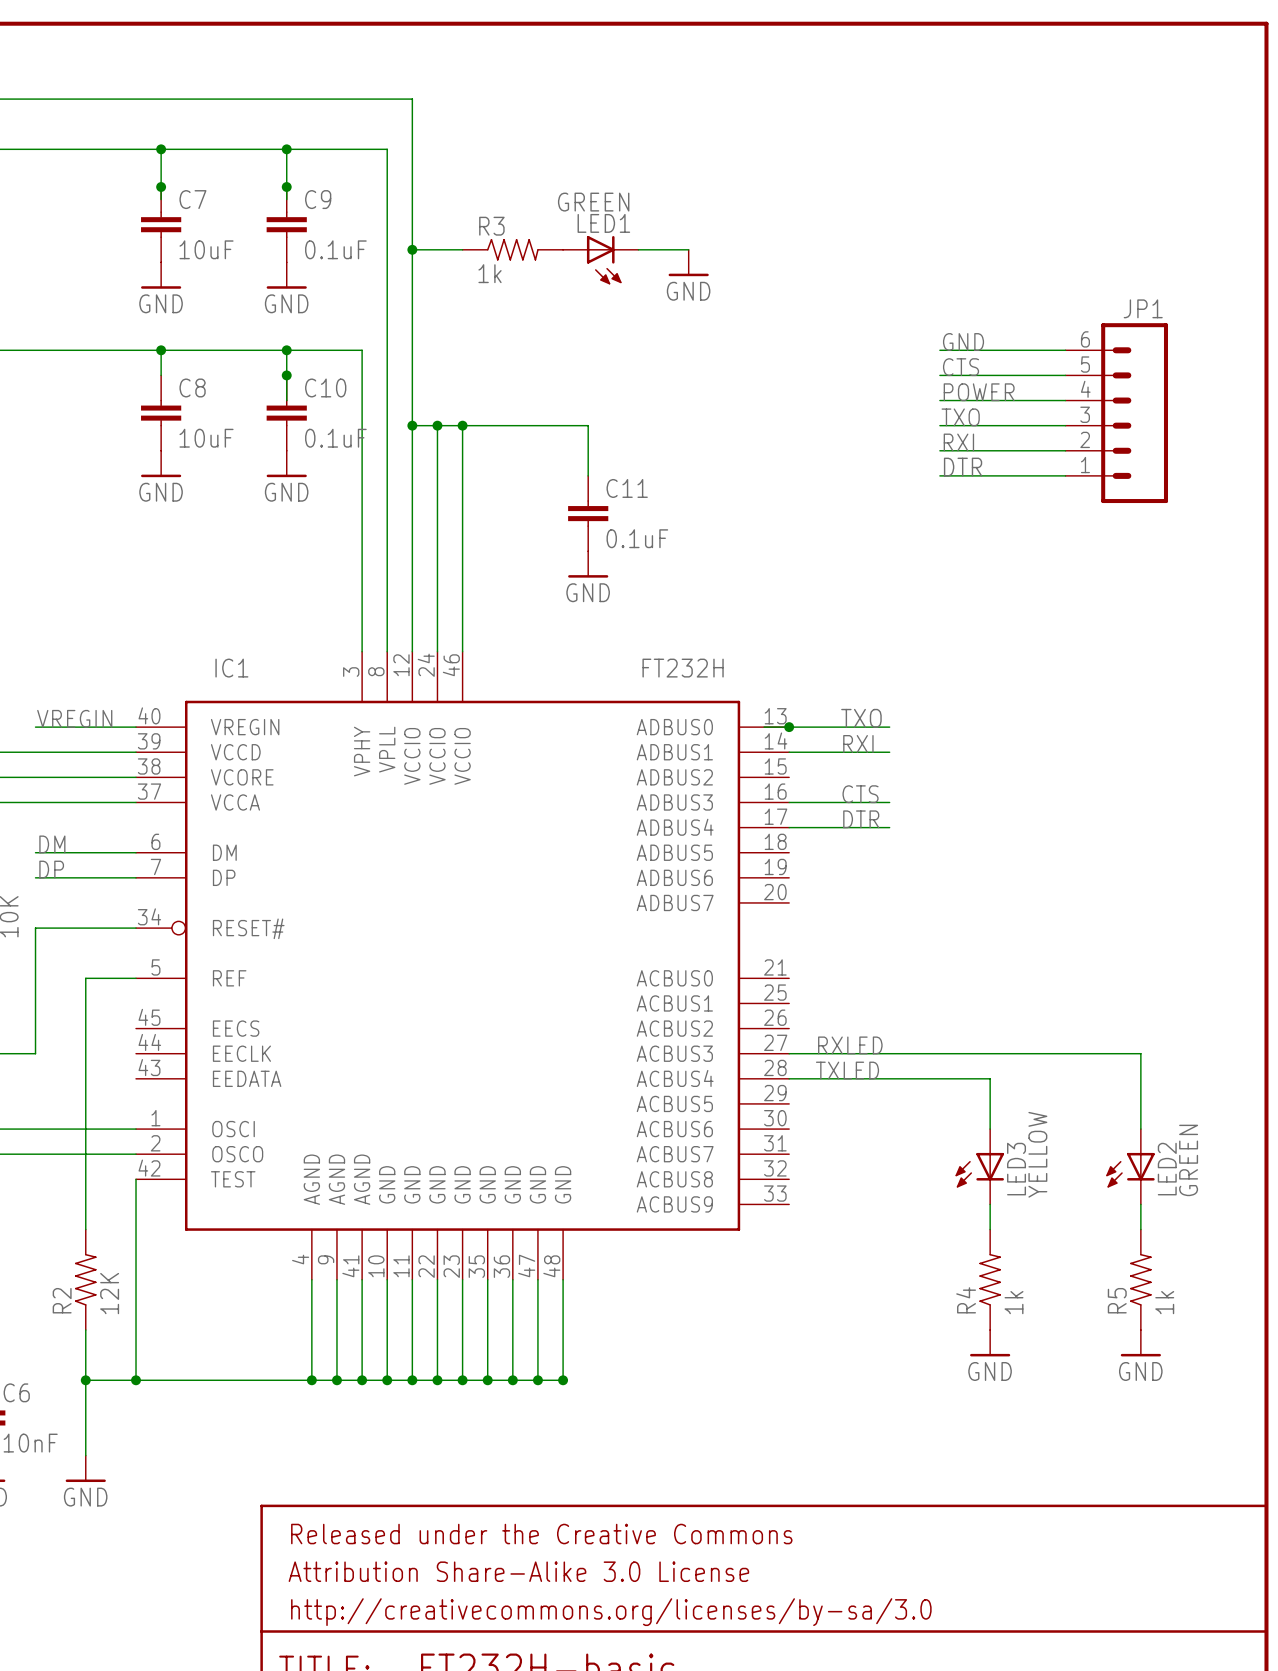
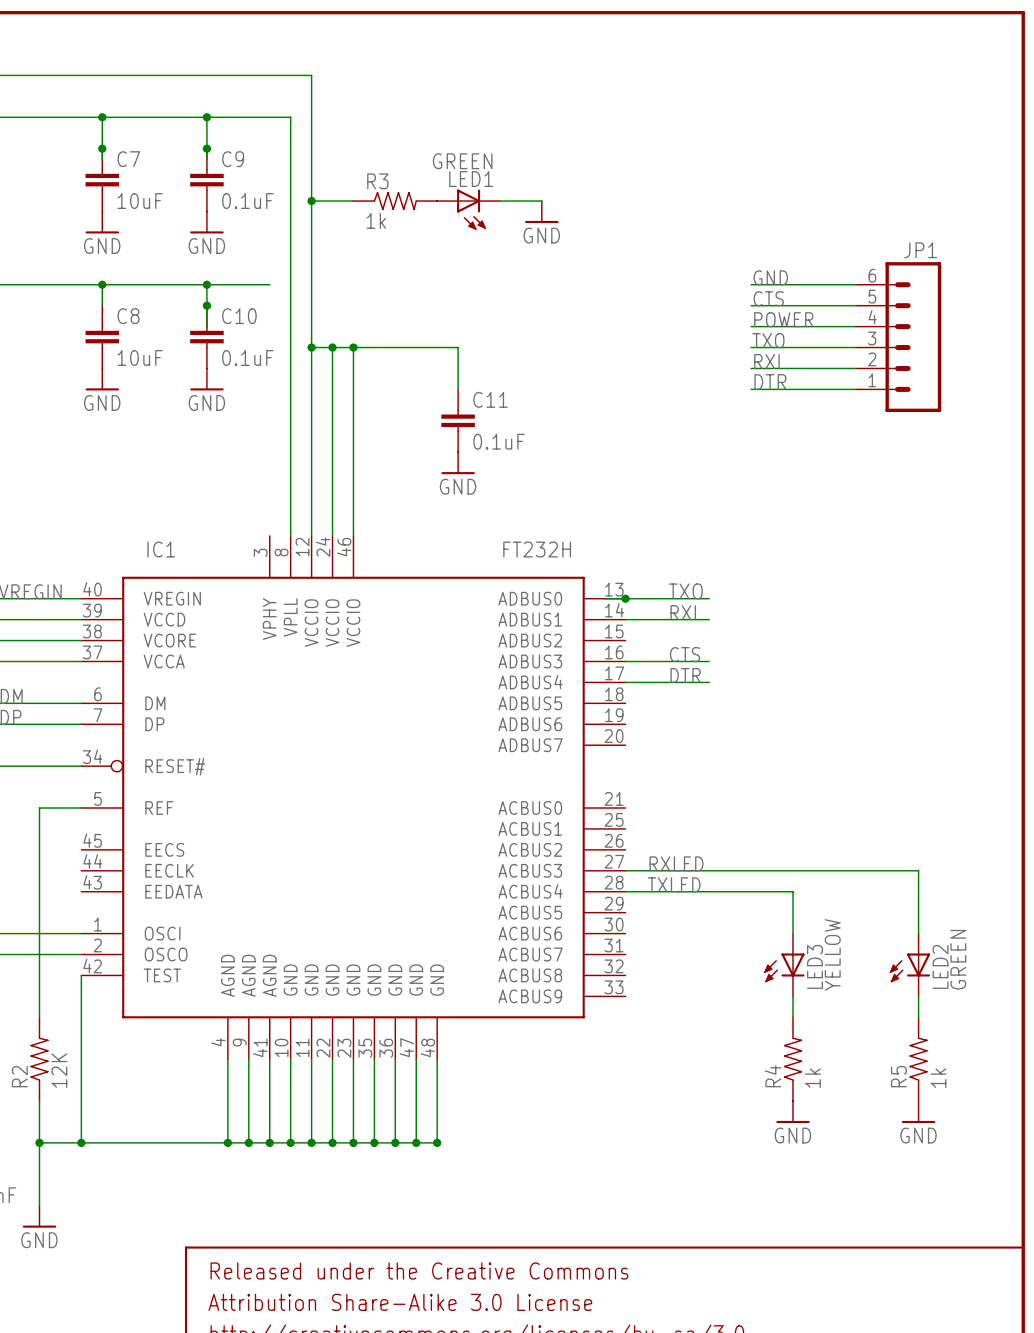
wire: (362, 350) (362, 651) -> none

